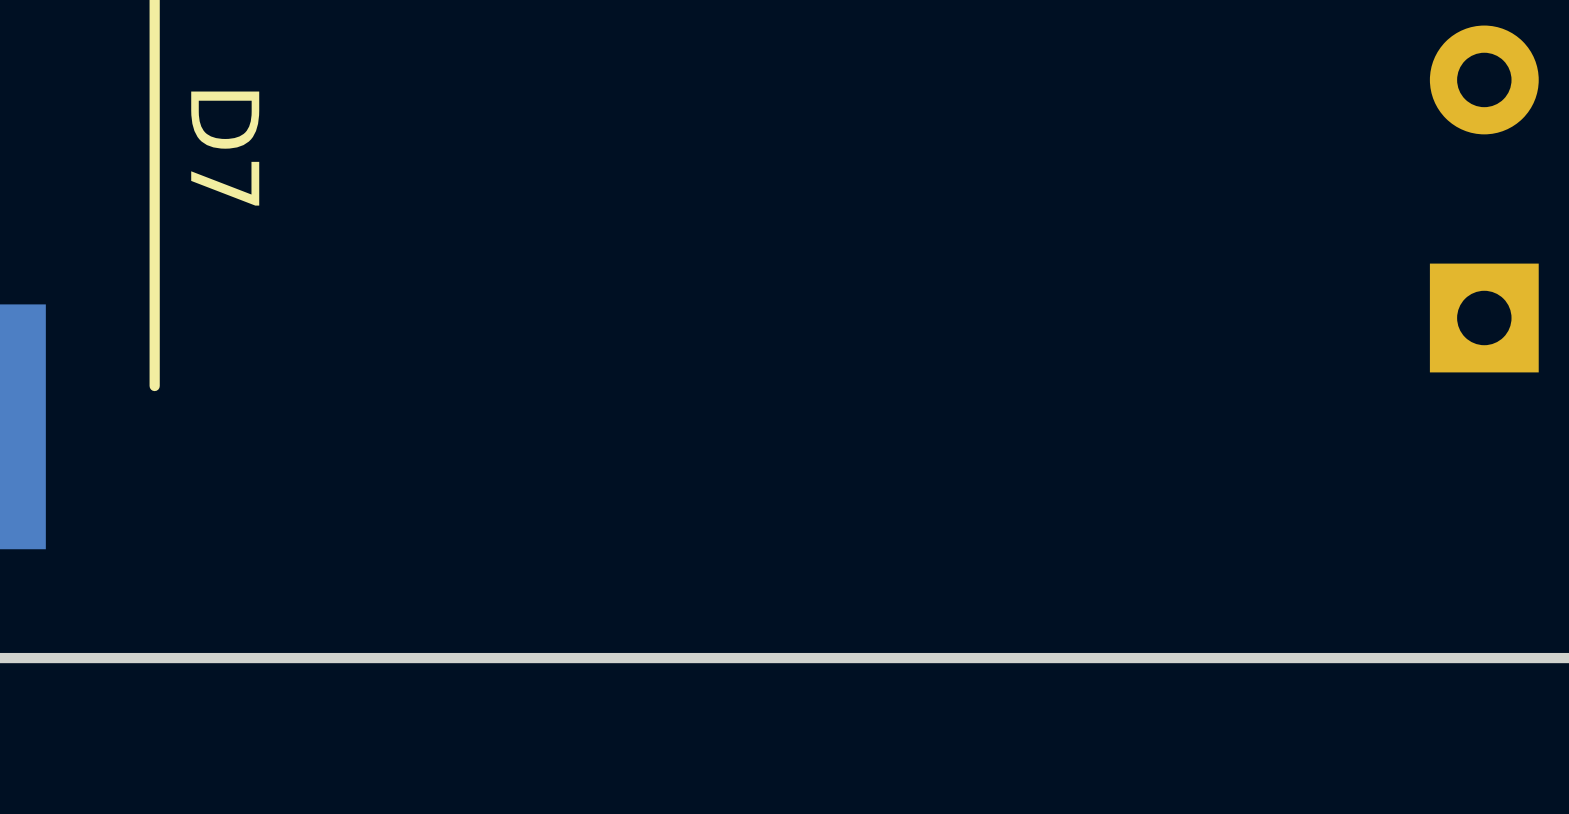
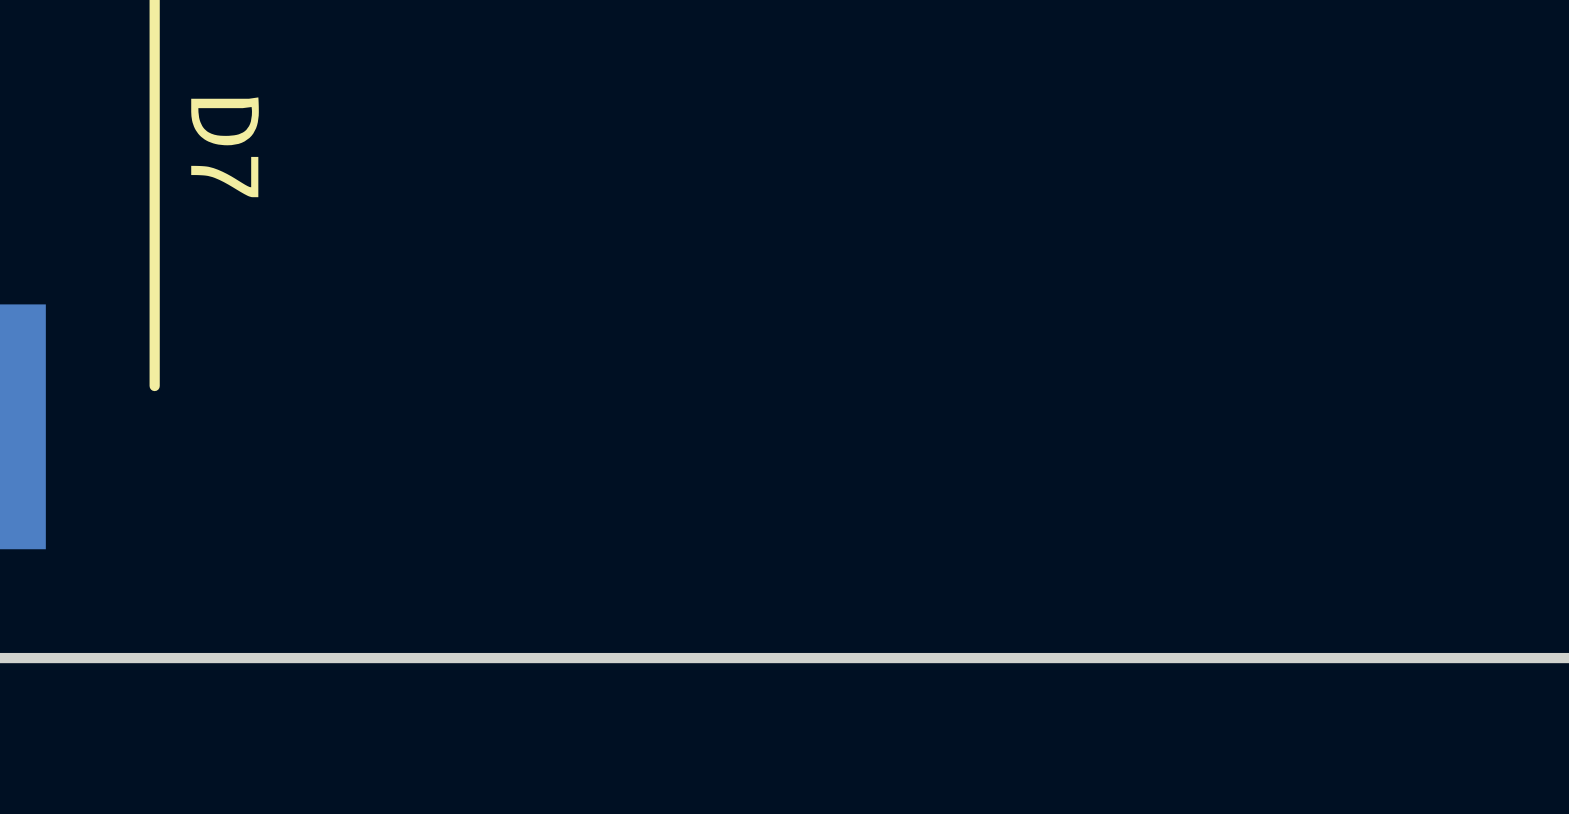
part: (1484, 198) -> none

